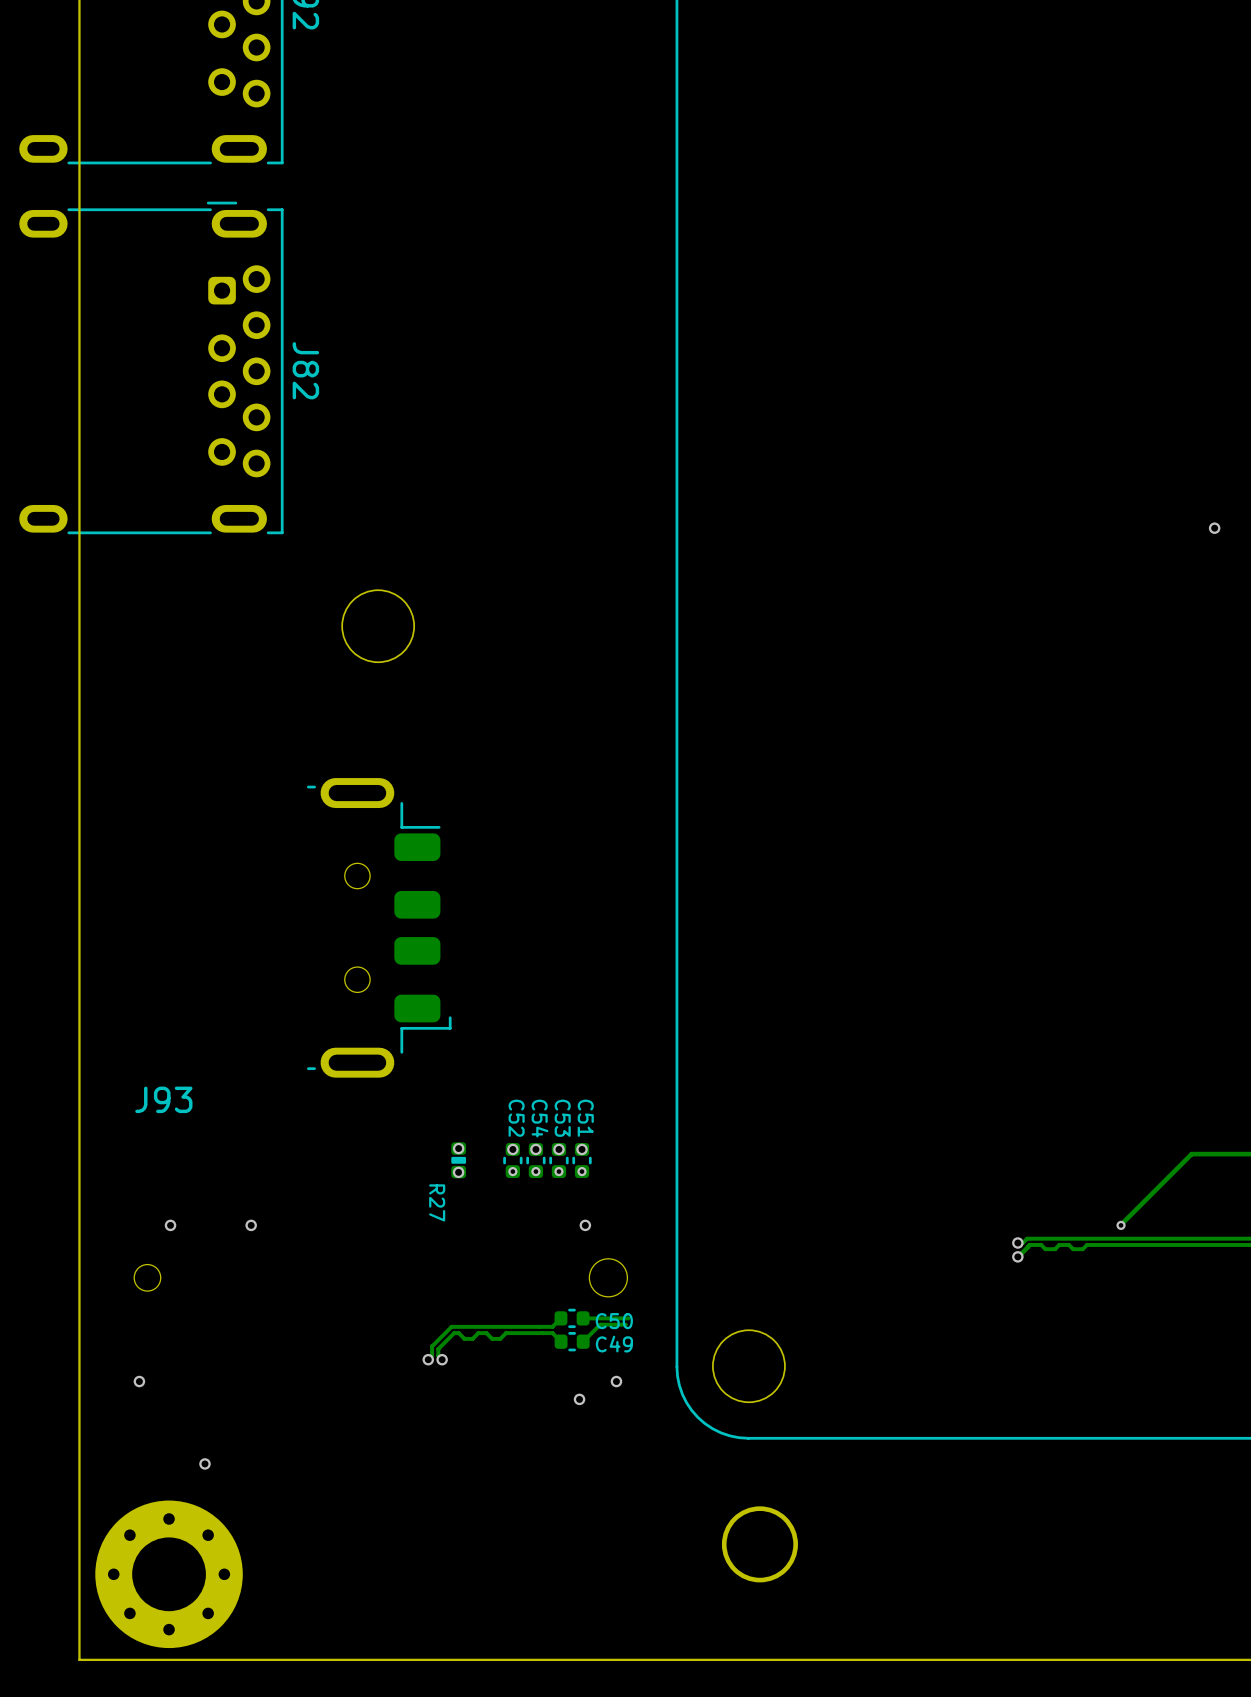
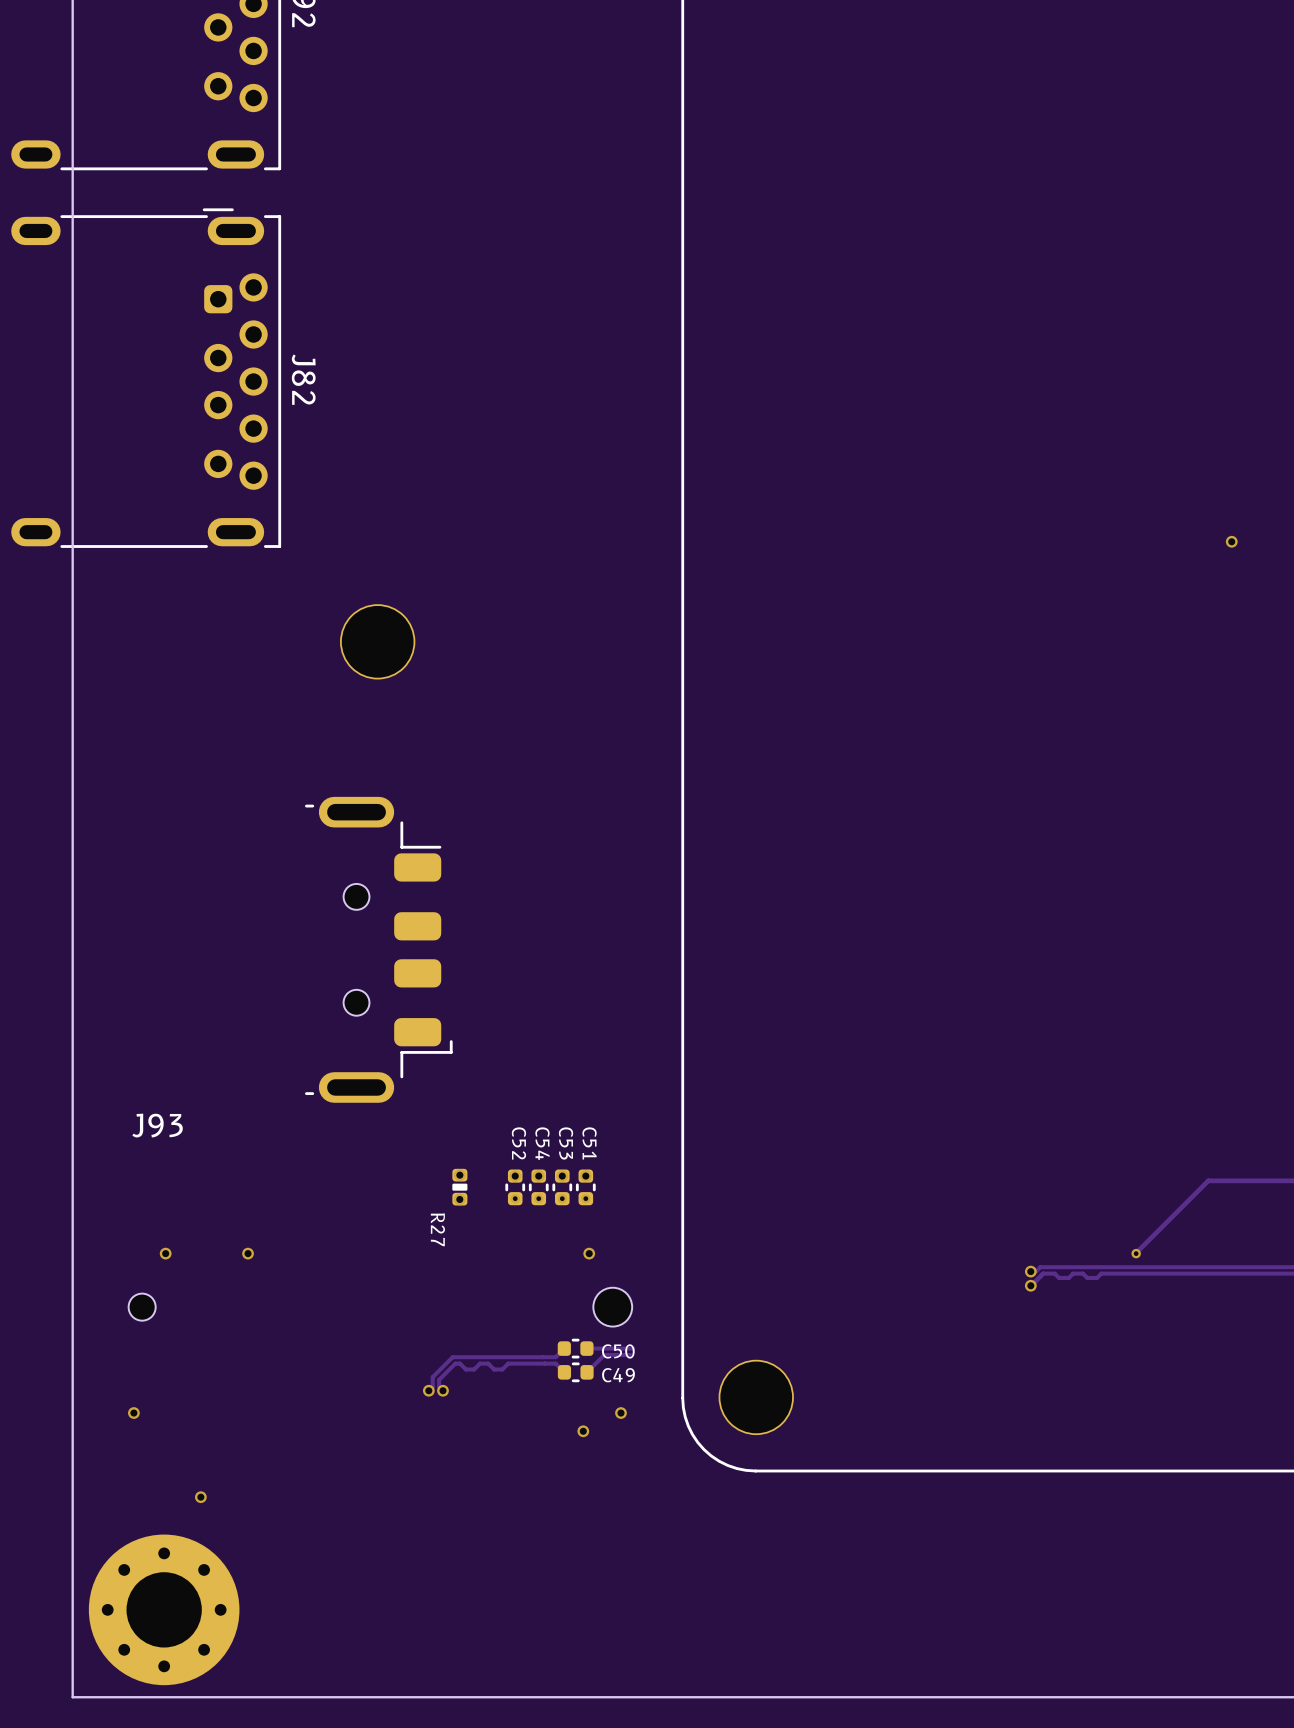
round board edge: [721, 1506, 798, 1583] -> none

